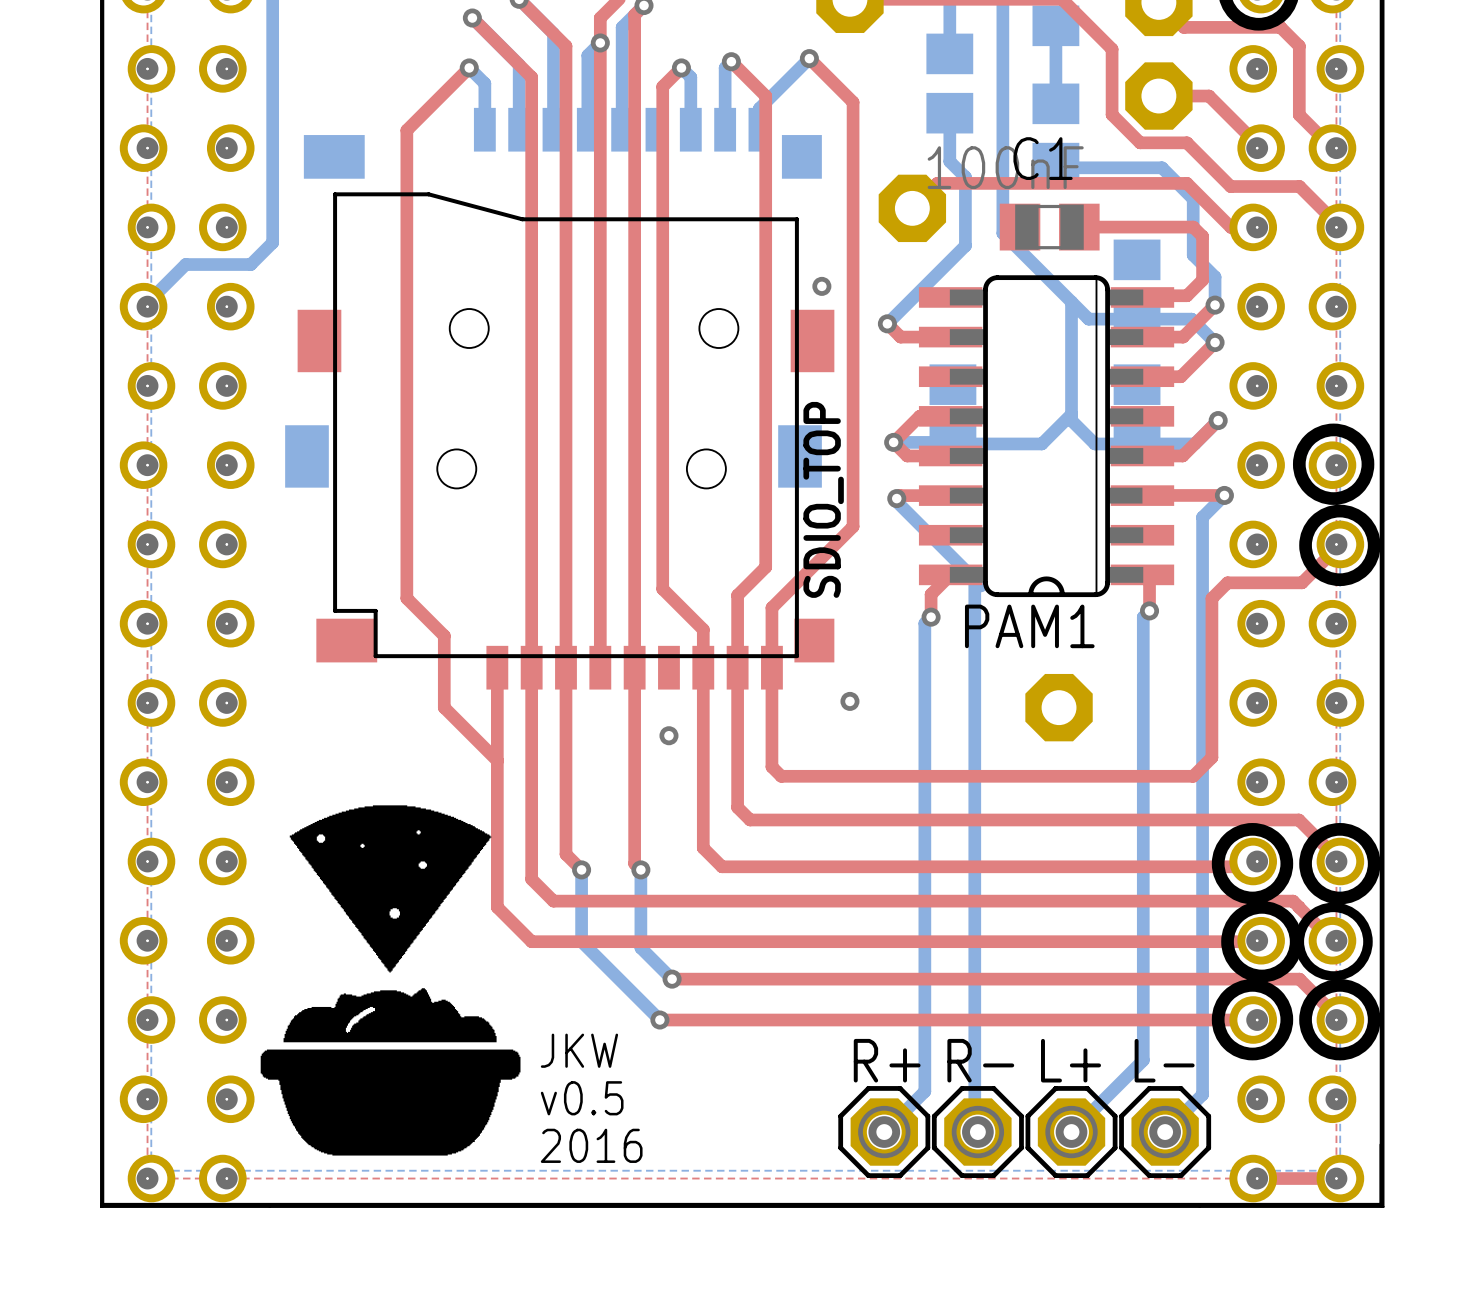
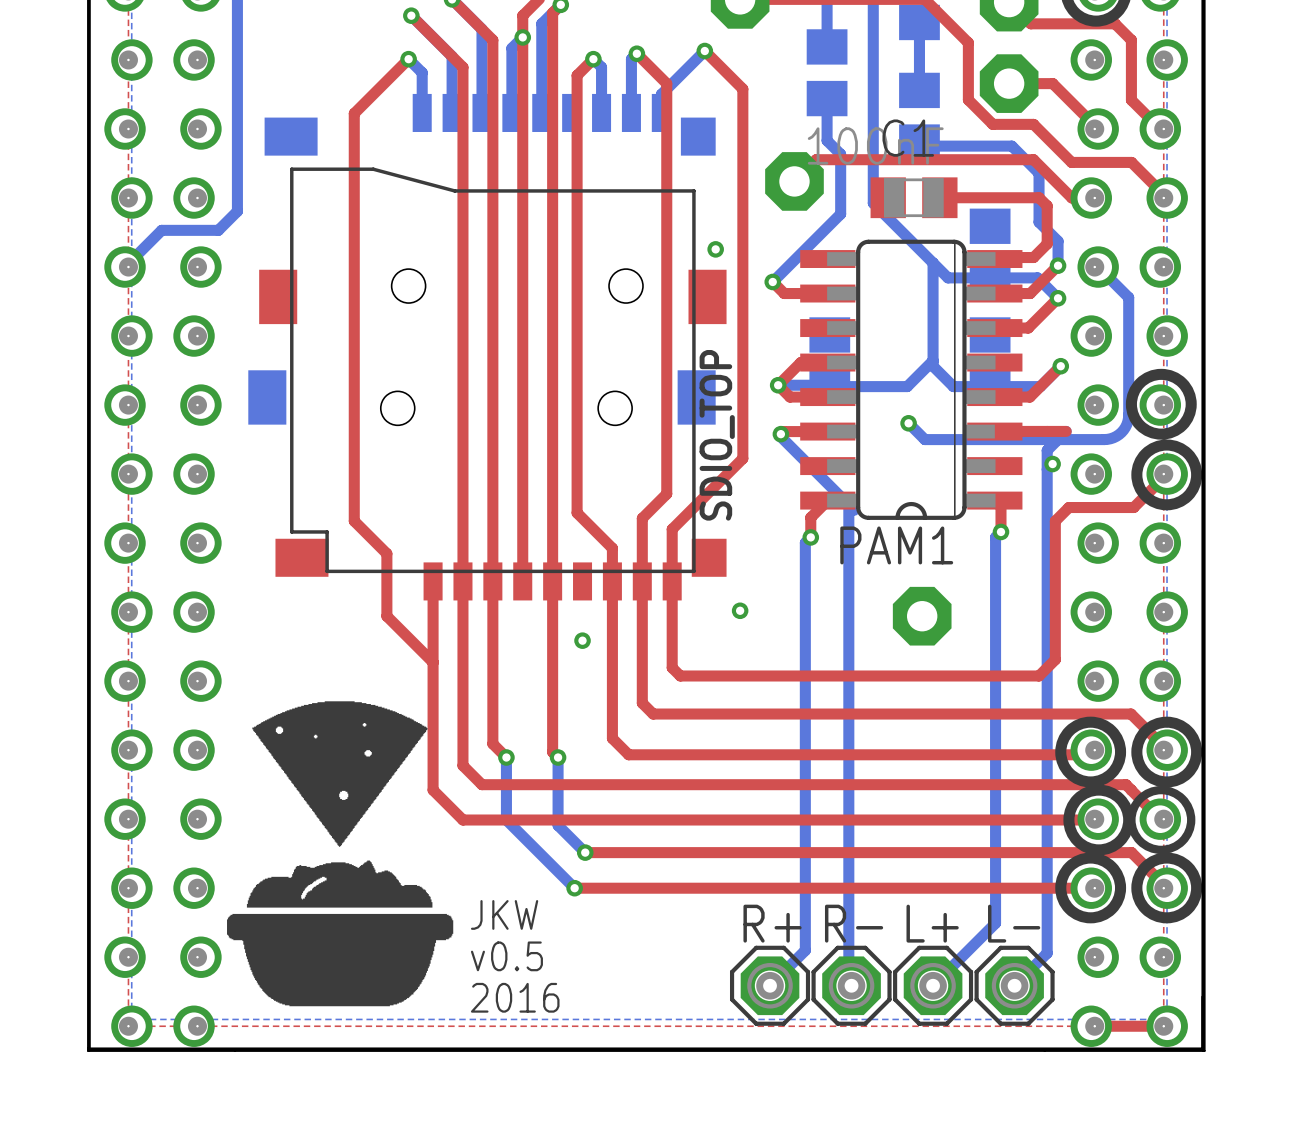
bottom track: none -> (1098, 267) (1128, 297) (1128, 418) (1125, 427) (1119, 434) (1104, 439) (924, 439) (908, 423)
via: none -> (908, 423)
via position: (1224, 495) -> (1052, 464)

